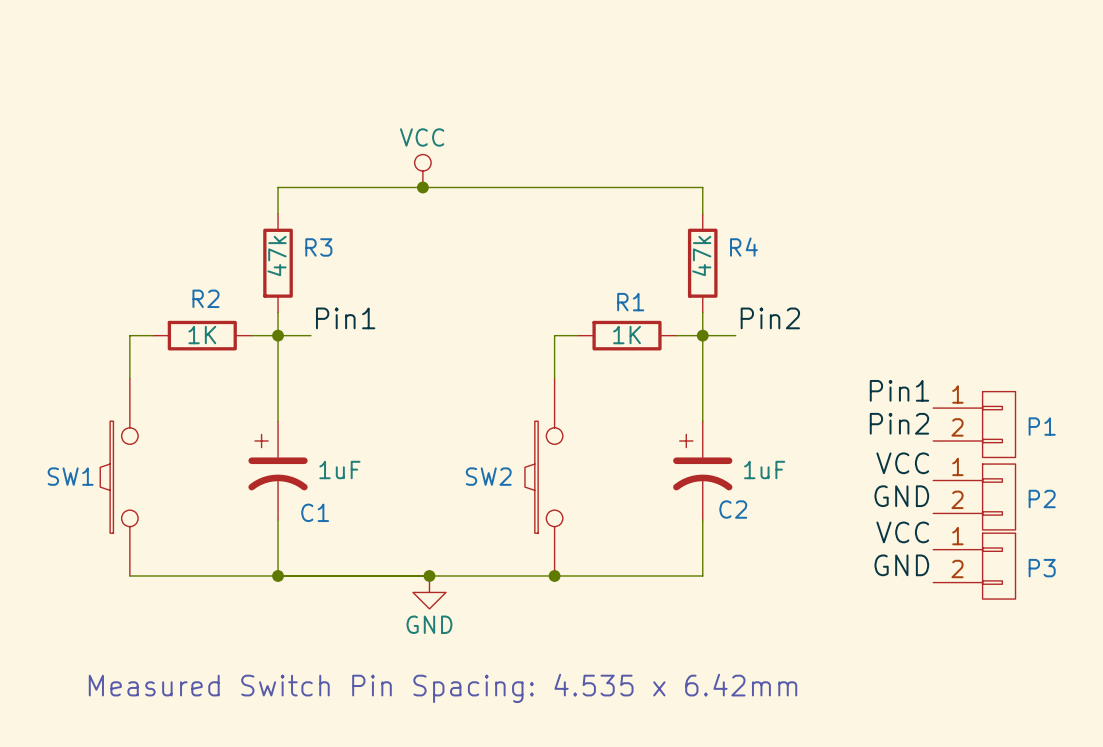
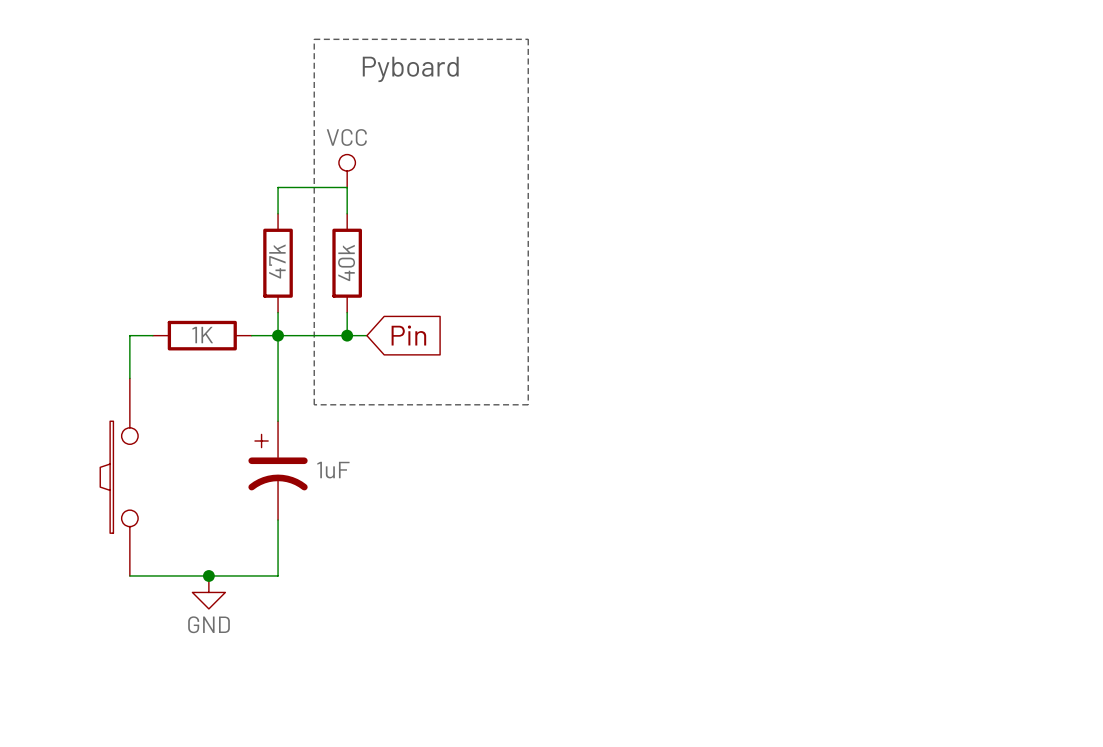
line: none -> (314, 39) (314, 404) (528, 404) (528, 39) (314, 39)
text: none -> Pyboard (410, 69)
power symbol position: VCC (422, 171) -> VCC (347, 171)
wire: (347, 187) (702, 187) (702, 213) -> (347, 187) (347, 213)
junction: (422, 187) -> none
R3 name: R3 (318, 247) -> none
part: none -> 40k (347, 263)
R4: 47k (702, 263) -> none
R2 name: R2 (205, 298) -> none
wire: none -> (347, 312) (347, 335)
wire: (702, 312) (702, 421) -> none
label: Pin1 (345, 318) -> none
label: Pin2 (770, 318) -> none
wire: none -> (310, 335) (366, 335)
junction: none -> (347, 335)
global label: none -> Pin (408, 335)
wire: (577, 335) (554, 335) (554, 378) -> none
R1: 1K (627, 335) -> none
wire: (676, 335) (735, 335) -> none
junction: (702, 335) -> none
label: Pin1 (899, 390) -> none
label: Pin2 (899, 423) -> none
P1: (974, 424) -> none
label: VCC (902, 463) -> none
C2: 1uF (702, 470) -> none
SW1 name: SW1 (70, 476) -> none
SW2: (543, 477) -> none
label: GND (901, 496) -> none
P2: (974, 496) -> none
C1 name: C1 (315, 512) -> none
wire: (702, 520) (702, 575) (278, 575) -> none
label: VCC (902, 532) -> none
label: GND (901, 565) -> none
P3: (974, 566) -> none
junction position: (278, 575) -> (208, 575)
junction: (429, 575) -> none
junction: (554, 575) -> none
power symbol position: GND (429, 592) -> GND (208, 592)
text: Measured Switch Pin Spacing: 4.535 x 6.42mm (443, 688) -> none

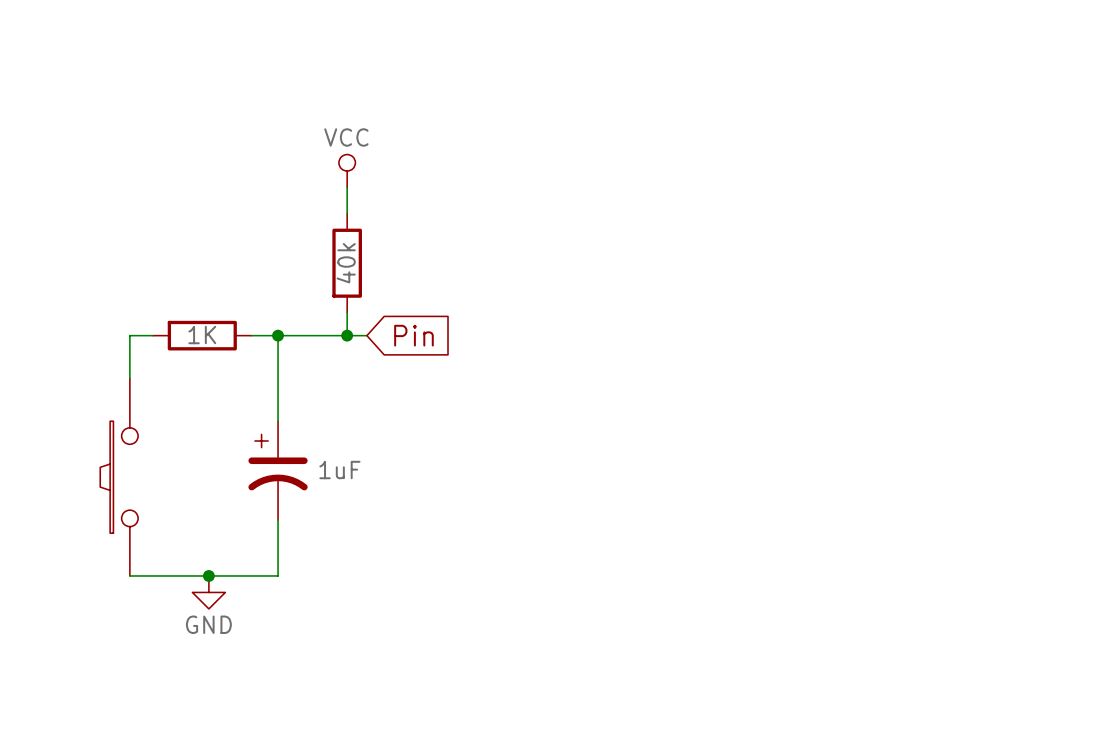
line: (314, 39) (314, 404) (528, 404) (528, 39) (314, 39) -> none
text: Pyboard (410, 69) -> none
wire: (347, 187) (278, 187) (278, 213) -> none
part: 47k (278, 263) -> none
wire: (278, 312) (278, 335) -> none

